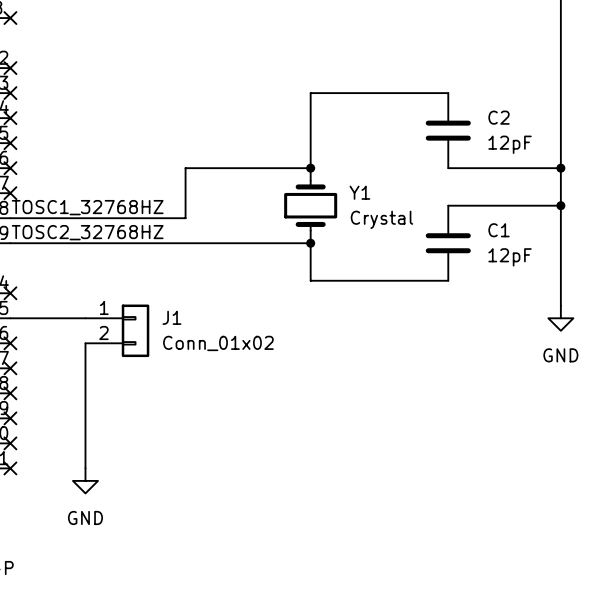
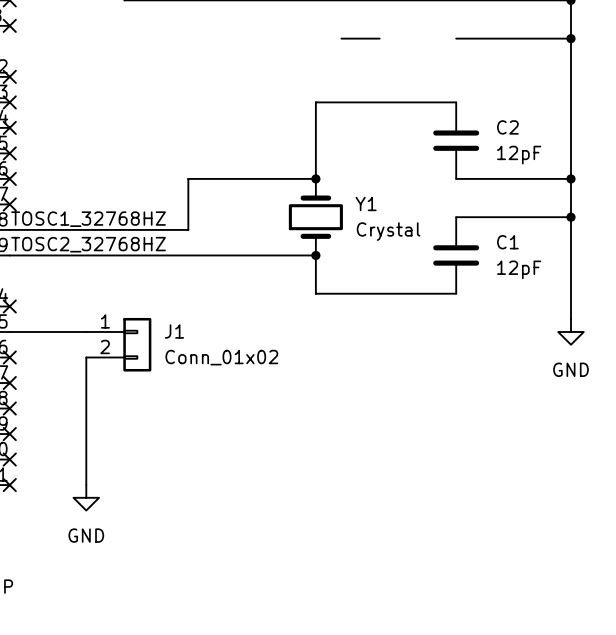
wire: none -> (341, 38) (379, 38)
wire: none -> (456, 38) (570, 38)
junction: none -> (570, 38)

